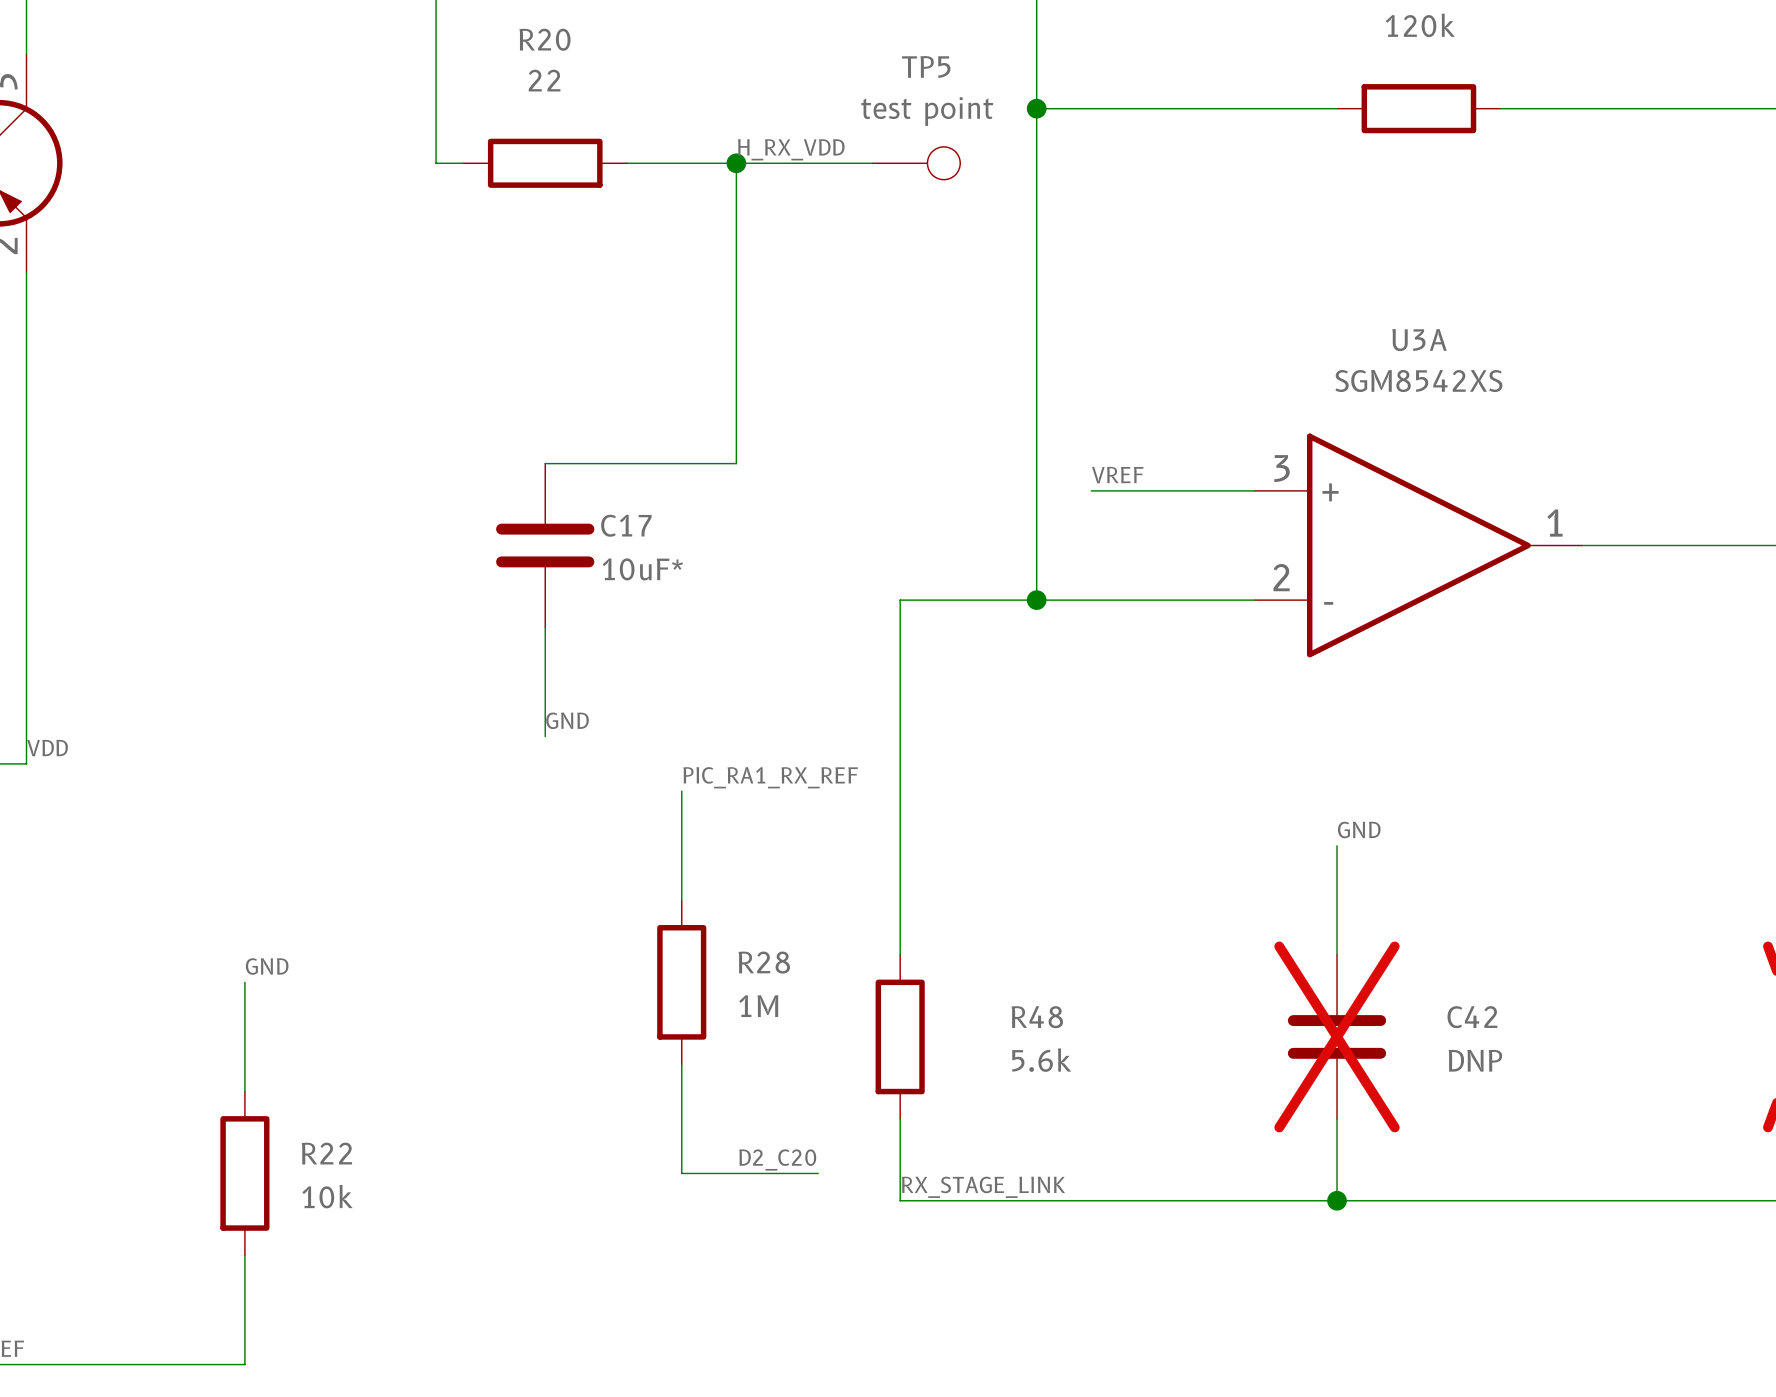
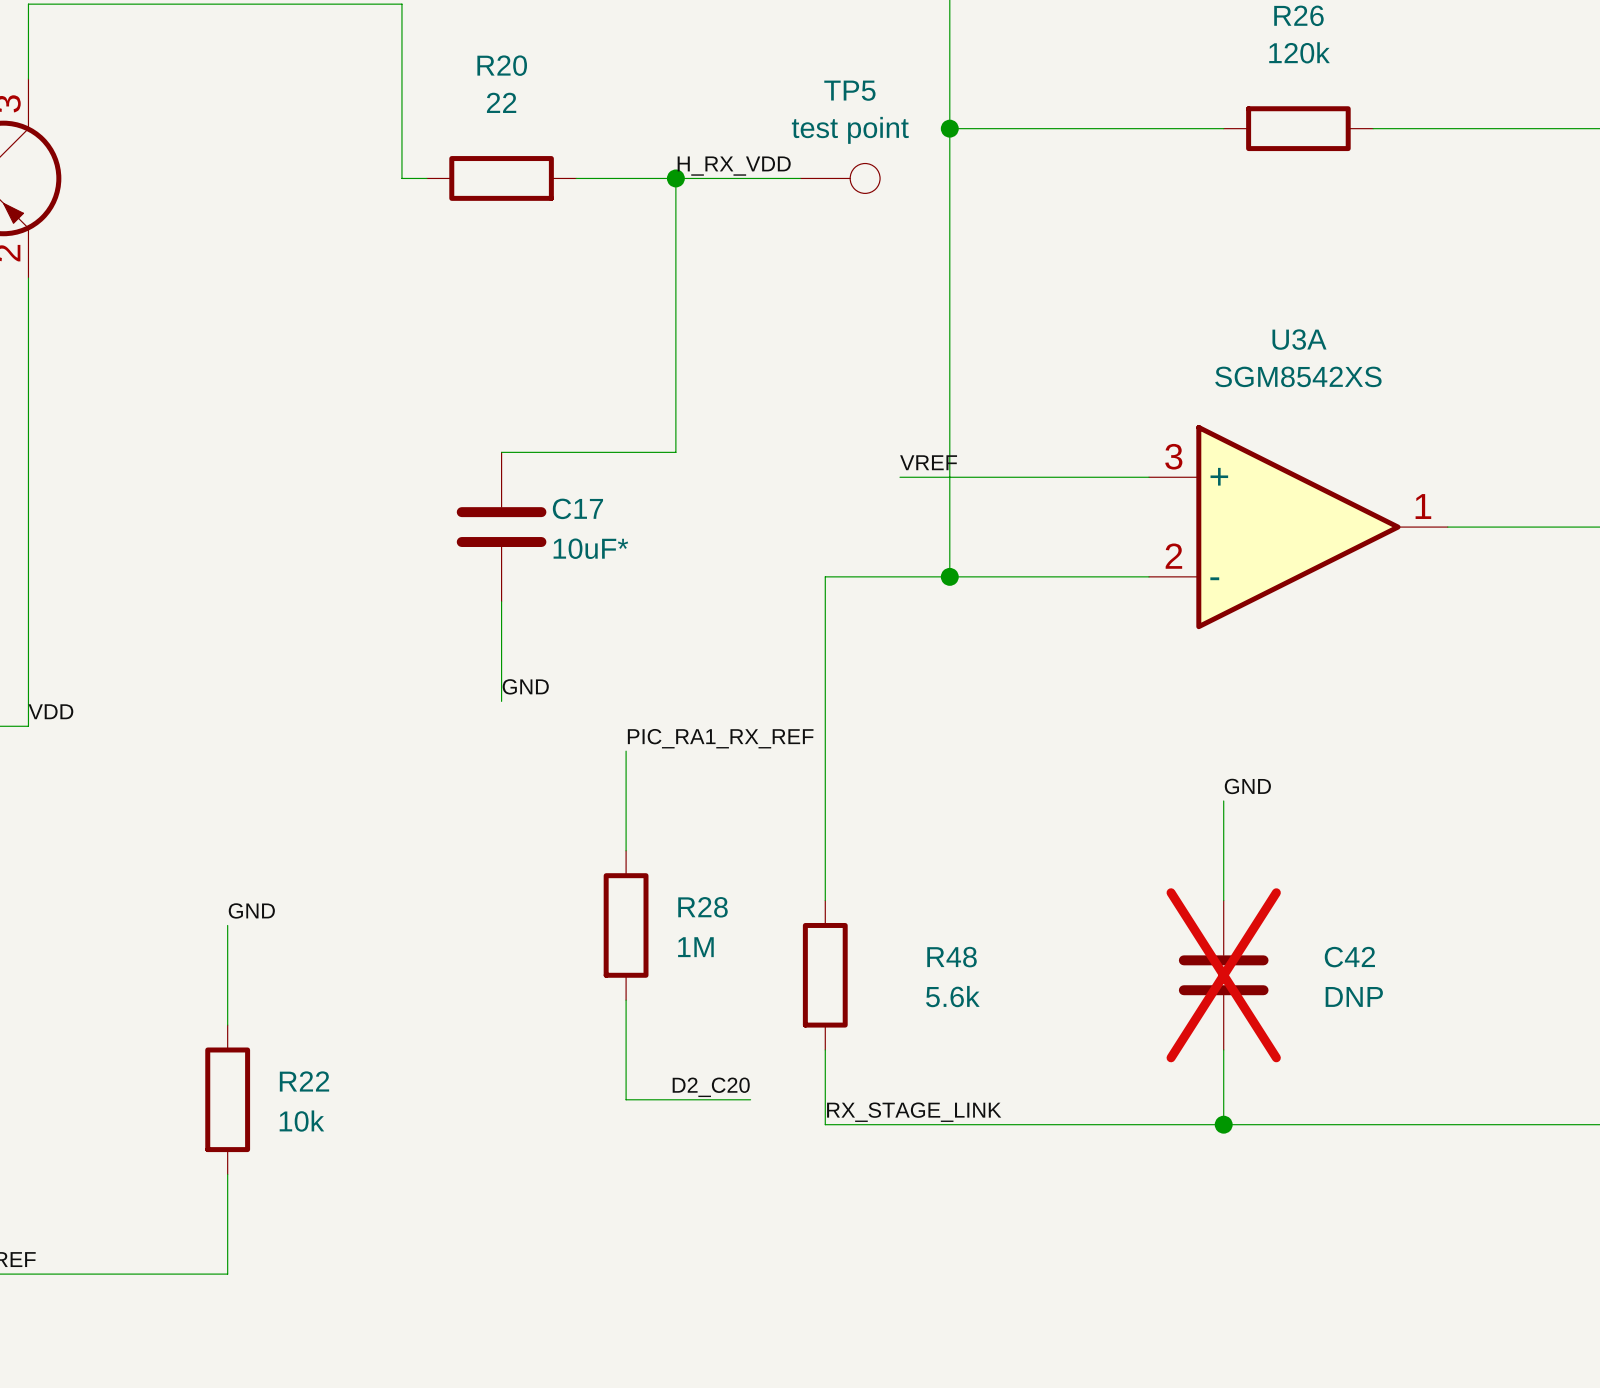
label position: VREF (1117, 475) -> VREF (928, 462)
wire: none -> (899, 477) (999, 477)

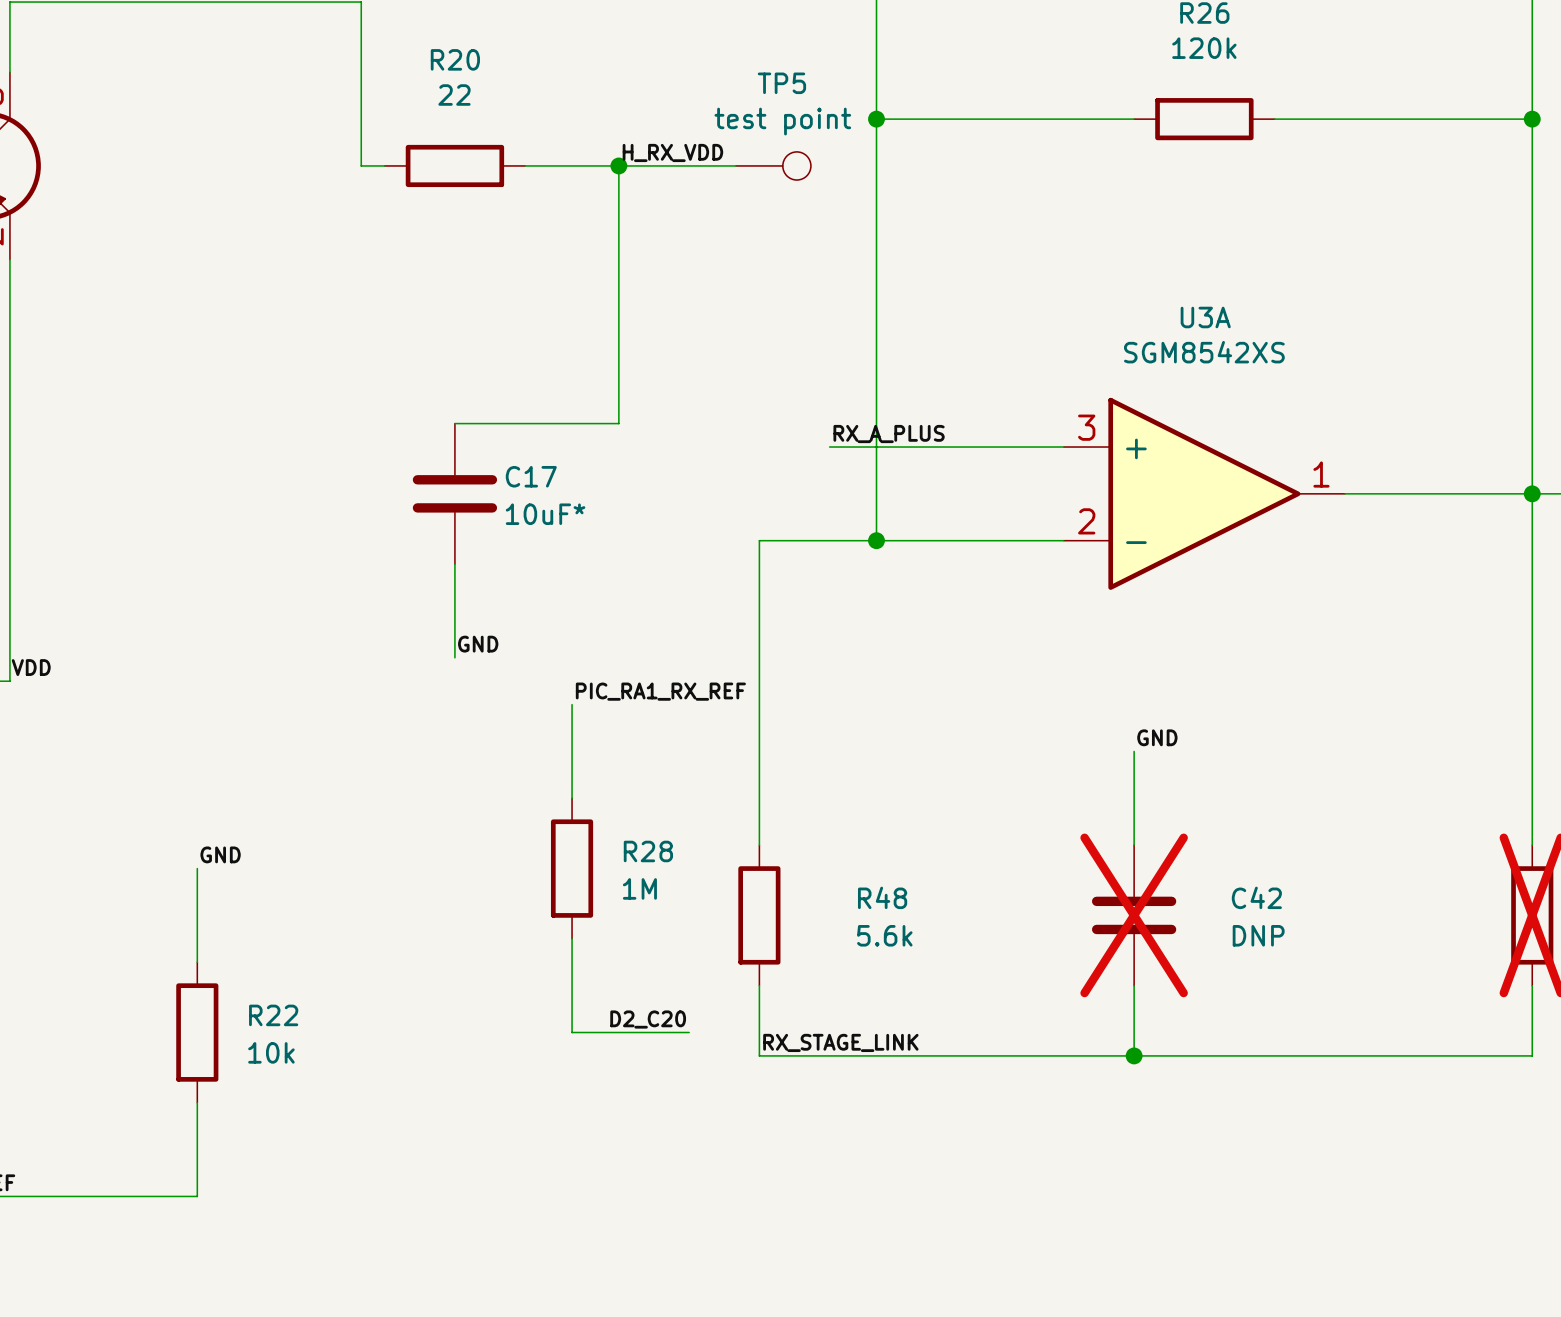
label: VREF (928, 462) -> RX_A_PLUS (889, 434)

